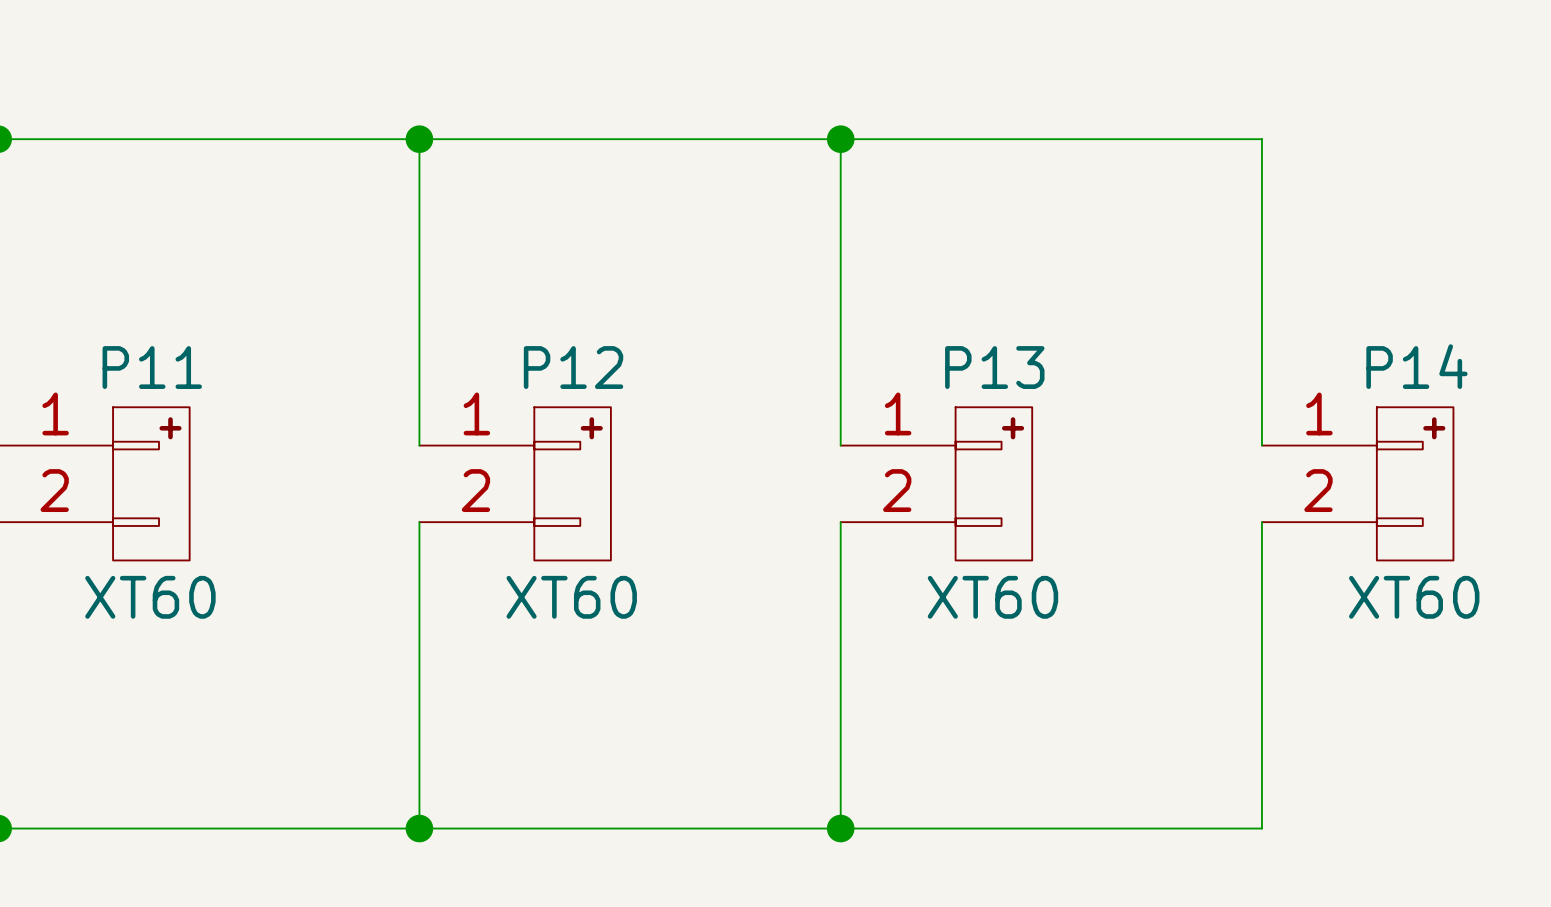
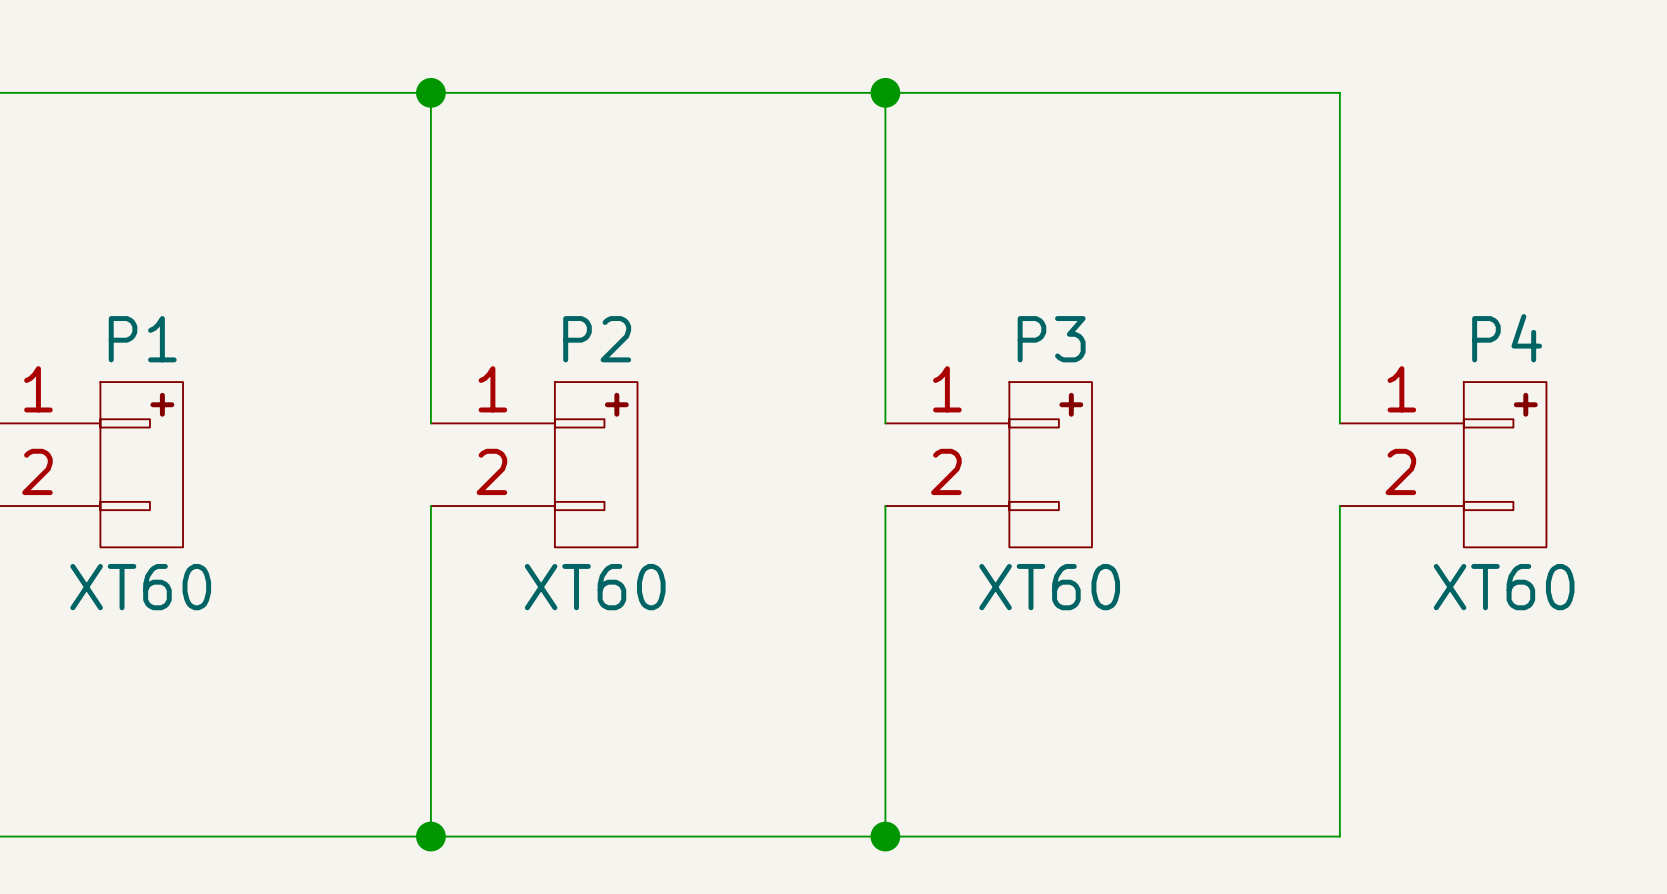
P14 name: P14 (1416, 366) -> P4 (1507, 338)
P11 name: P11 (152, 367) -> P1 (142, 339)
P12 name: P12 (573, 367) -> P2 (597, 339)
P13 name: P13 (994, 367) -> P3 (1051, 339)

